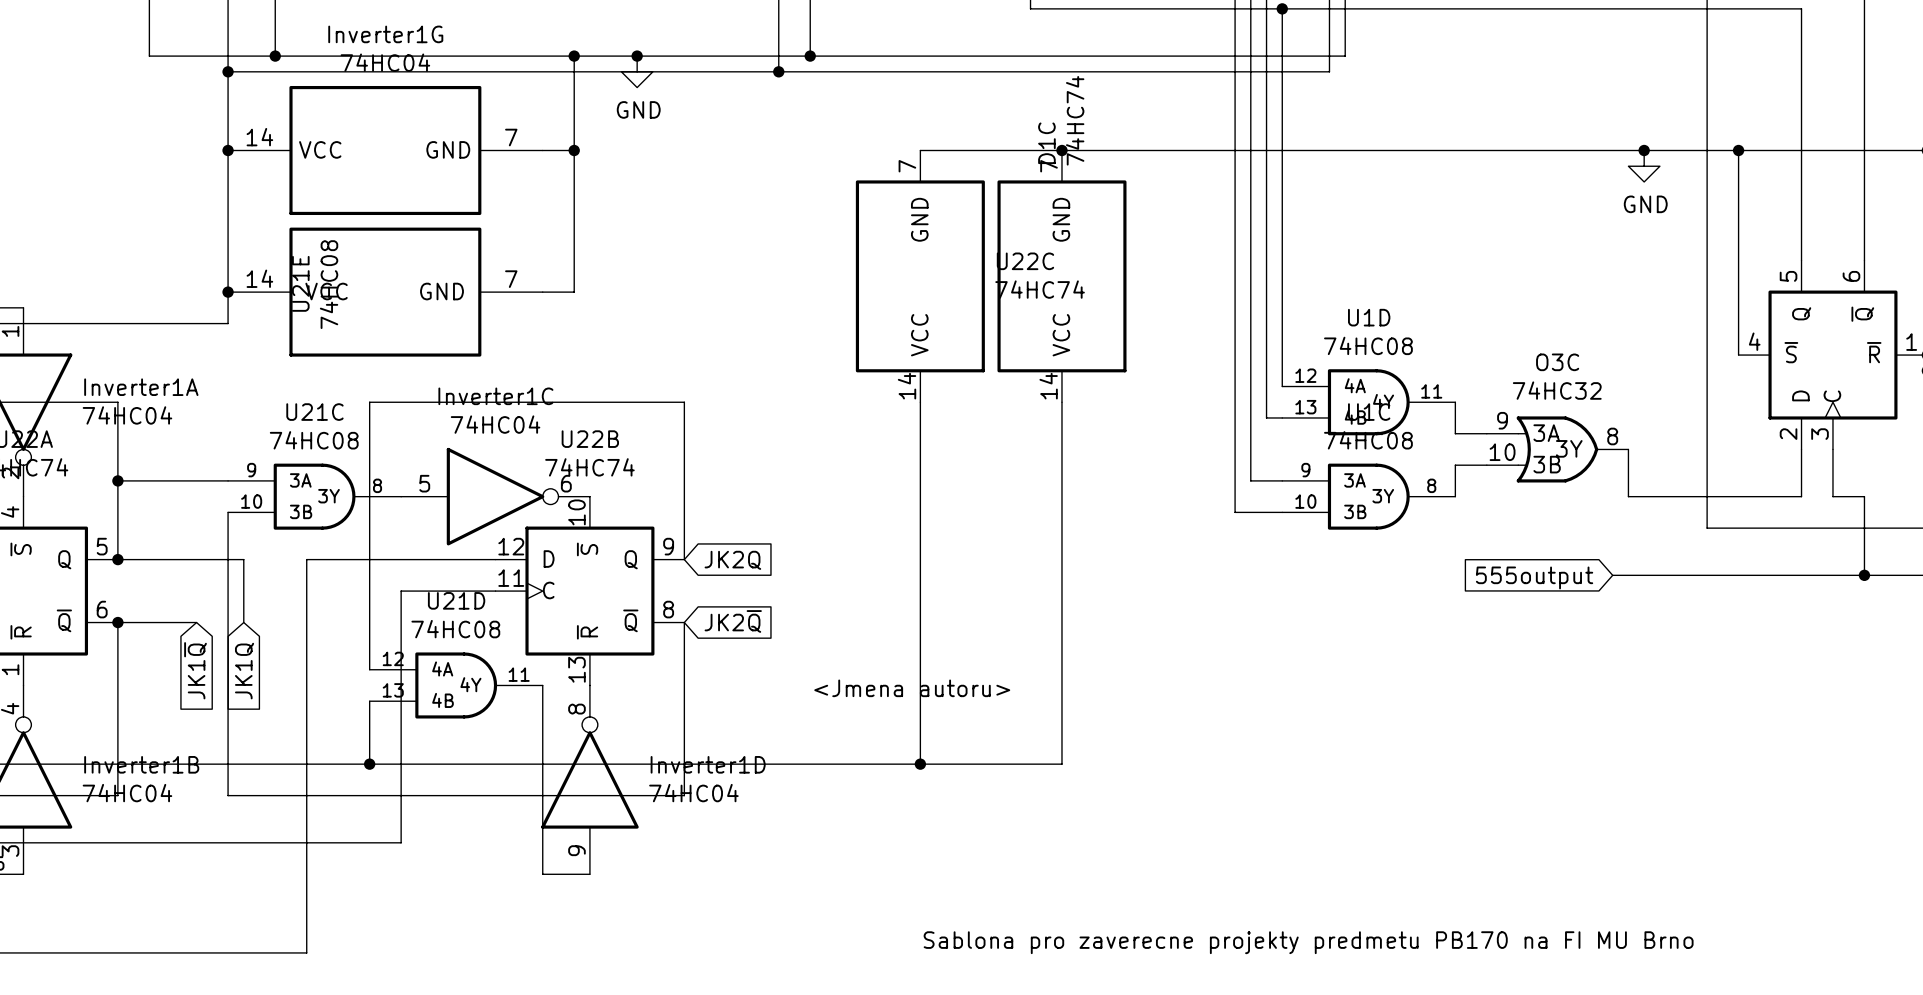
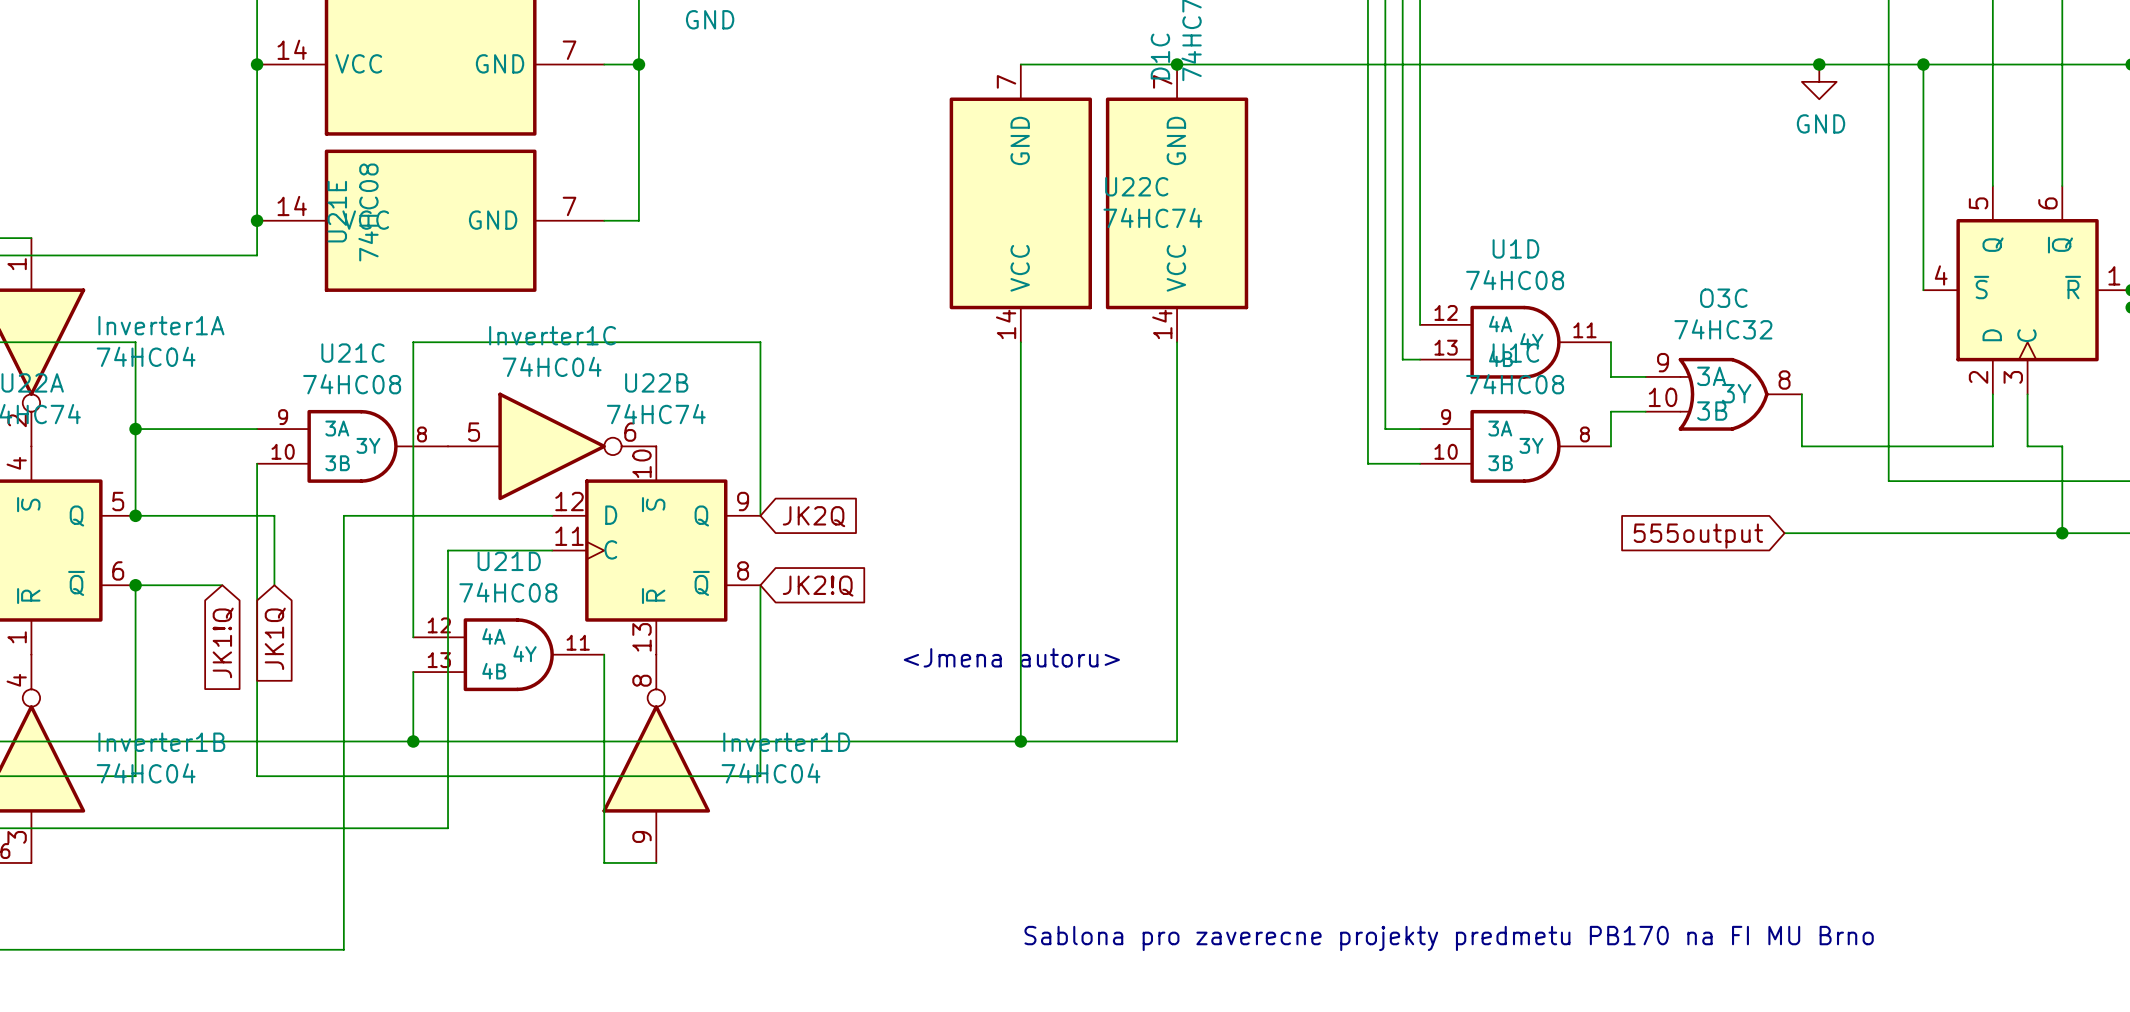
global label: JK2~{Q} (733, 621) -> JK2!Q (818, 586)
global label: JK1~{Q} (195, 670) -> JK1!Q (223, 642)

